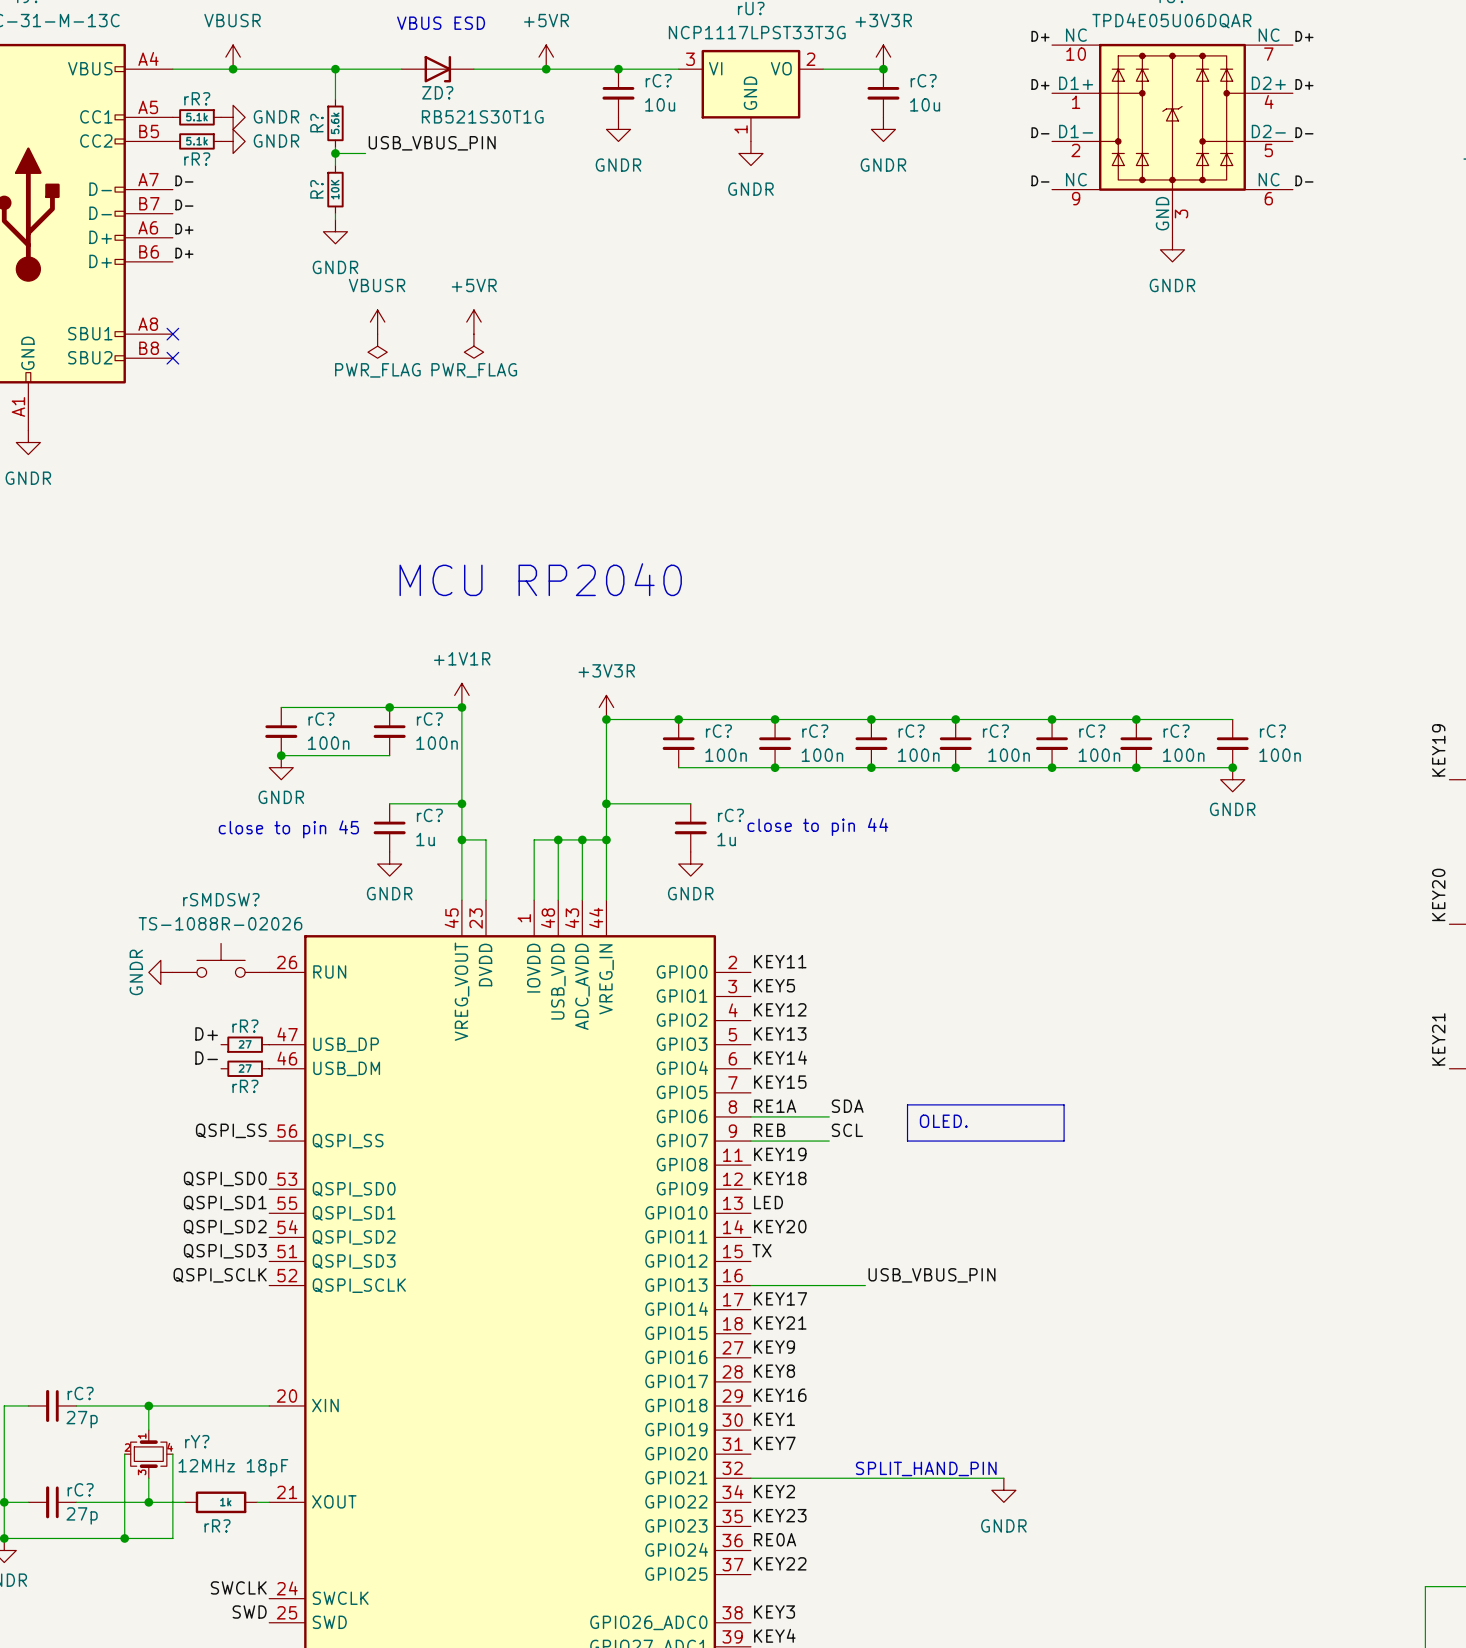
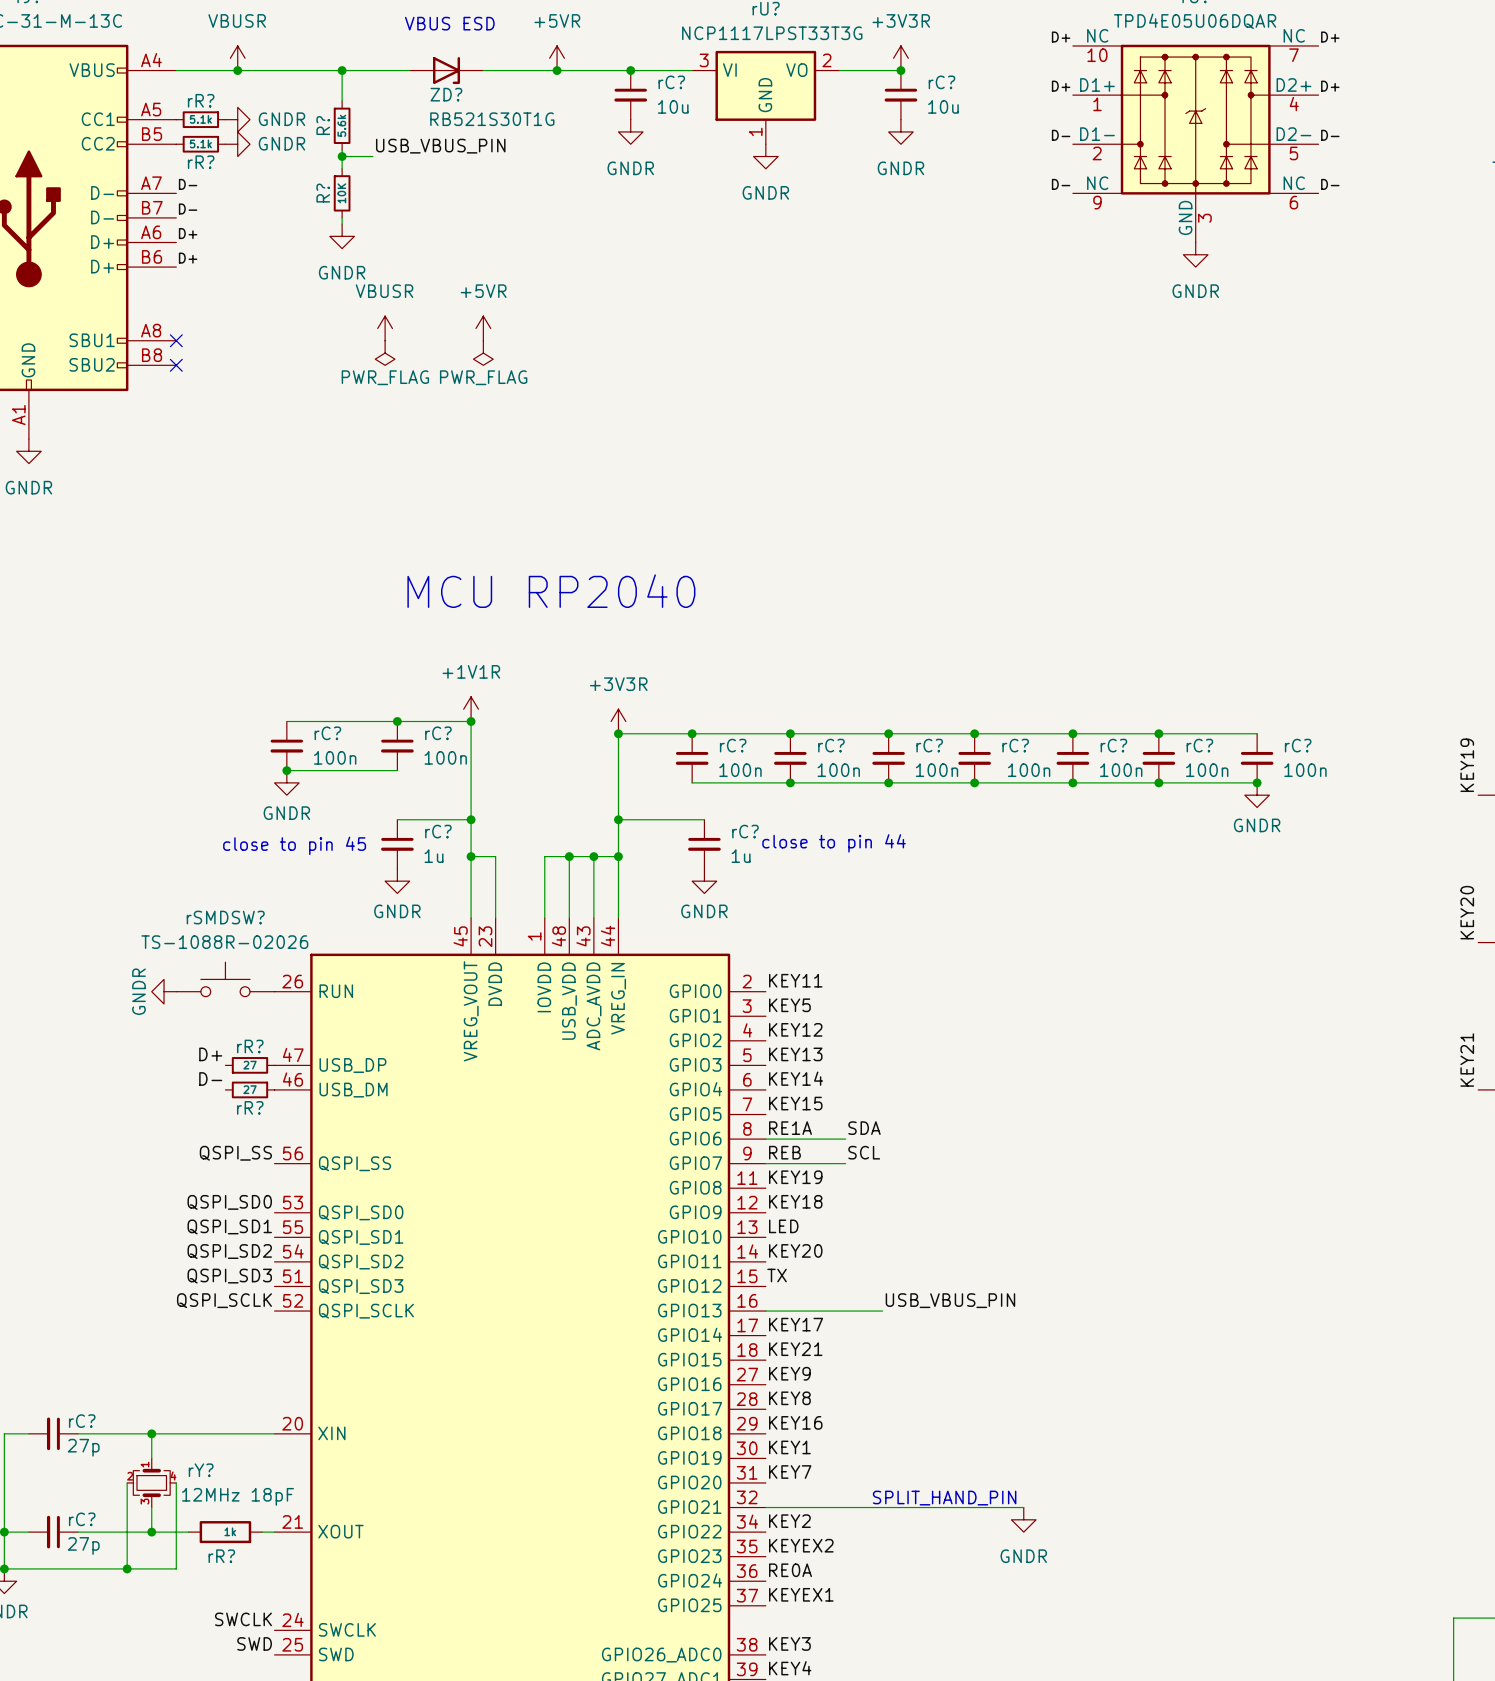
line: (907, 1104) (1064, 1104) (1064, 1141) (907, 1141) (907, 1104) -> none
text: OLED. (943, 1121) -> none
label: KEY23 (780, 1515) -> KEYEX2 (801, 1545)
label: KEY22 (780, 1563) -> KEYEX1 (801, 1594)

